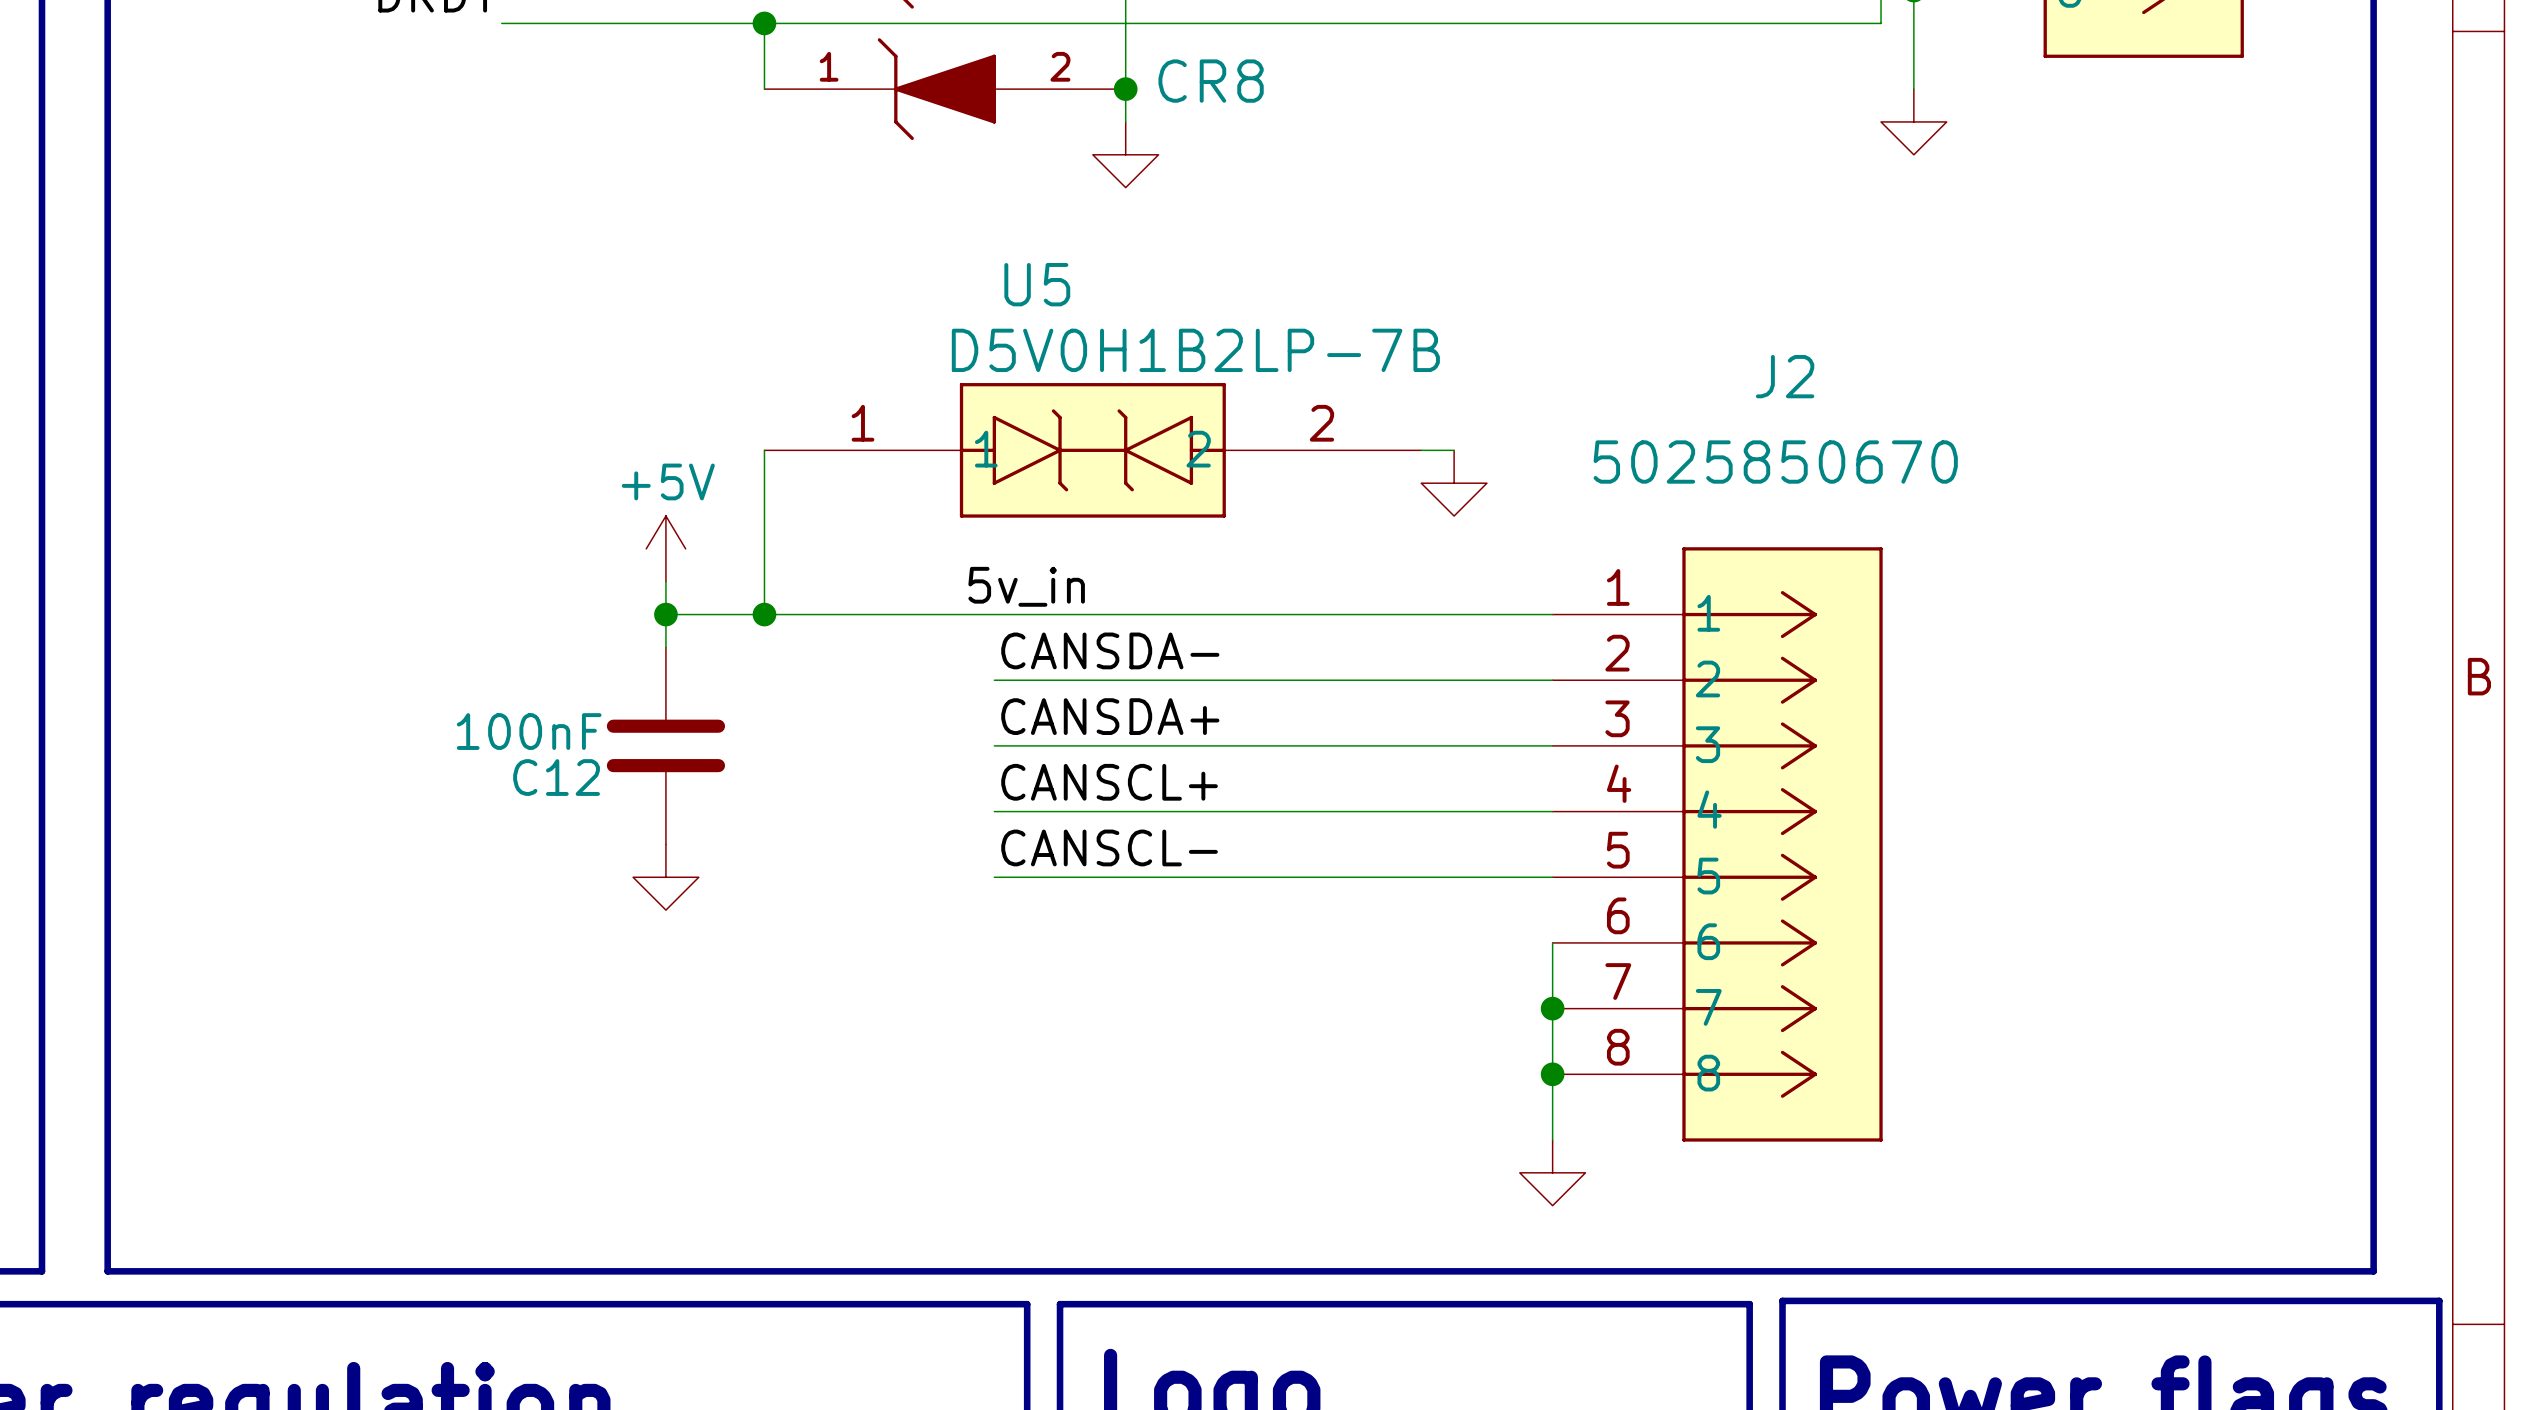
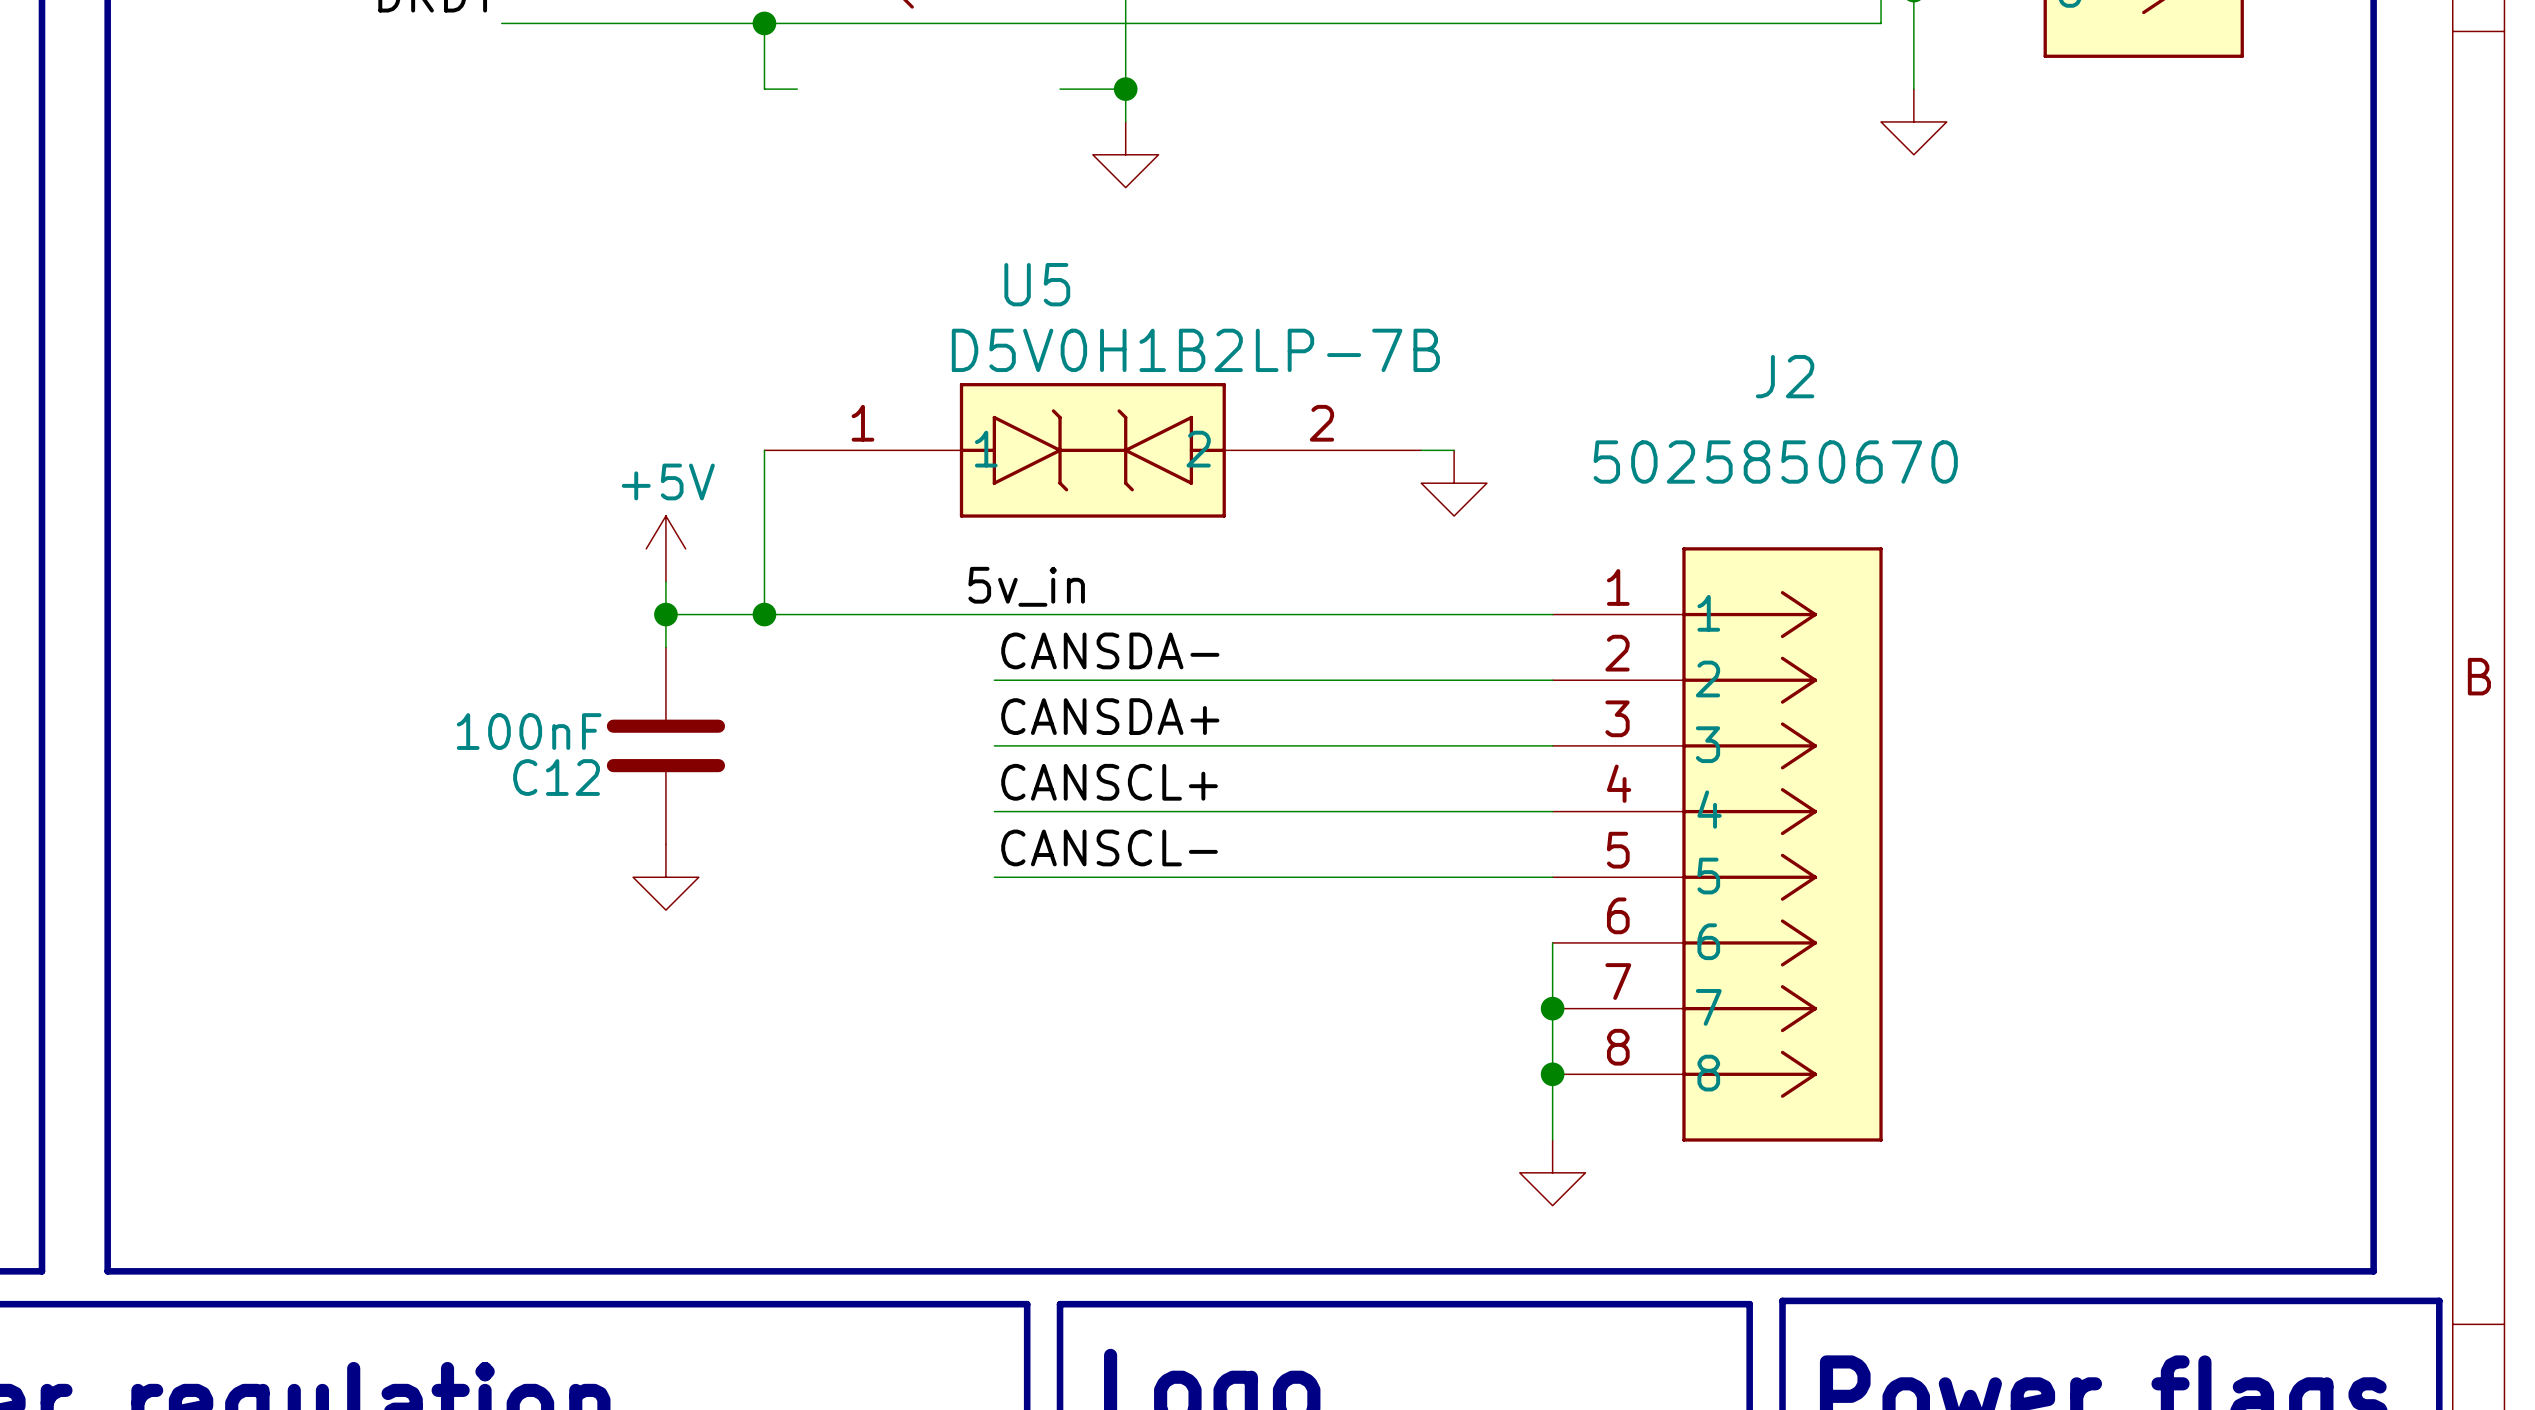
CR8: (945, 89) -> none

